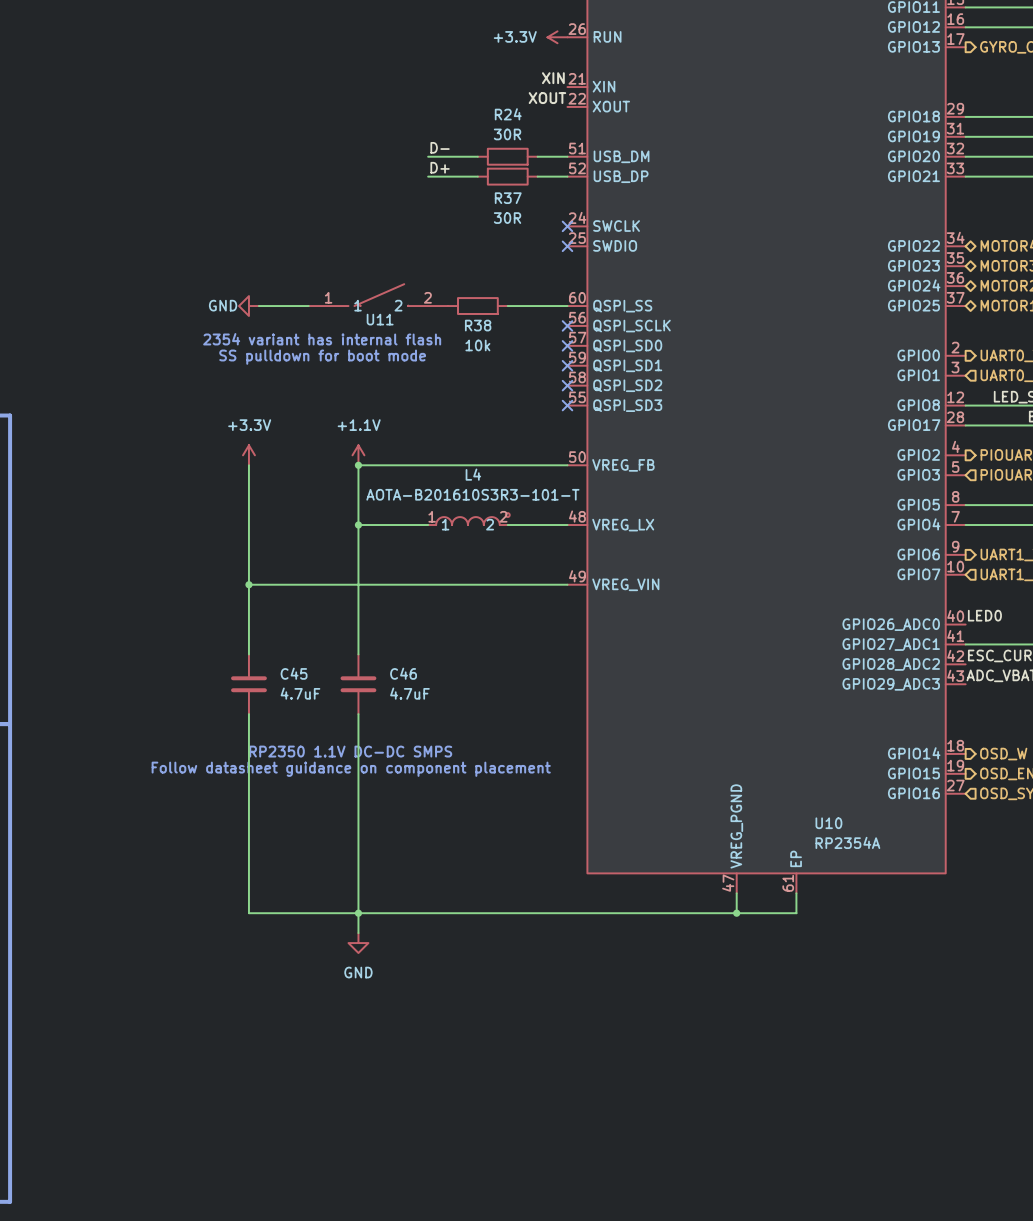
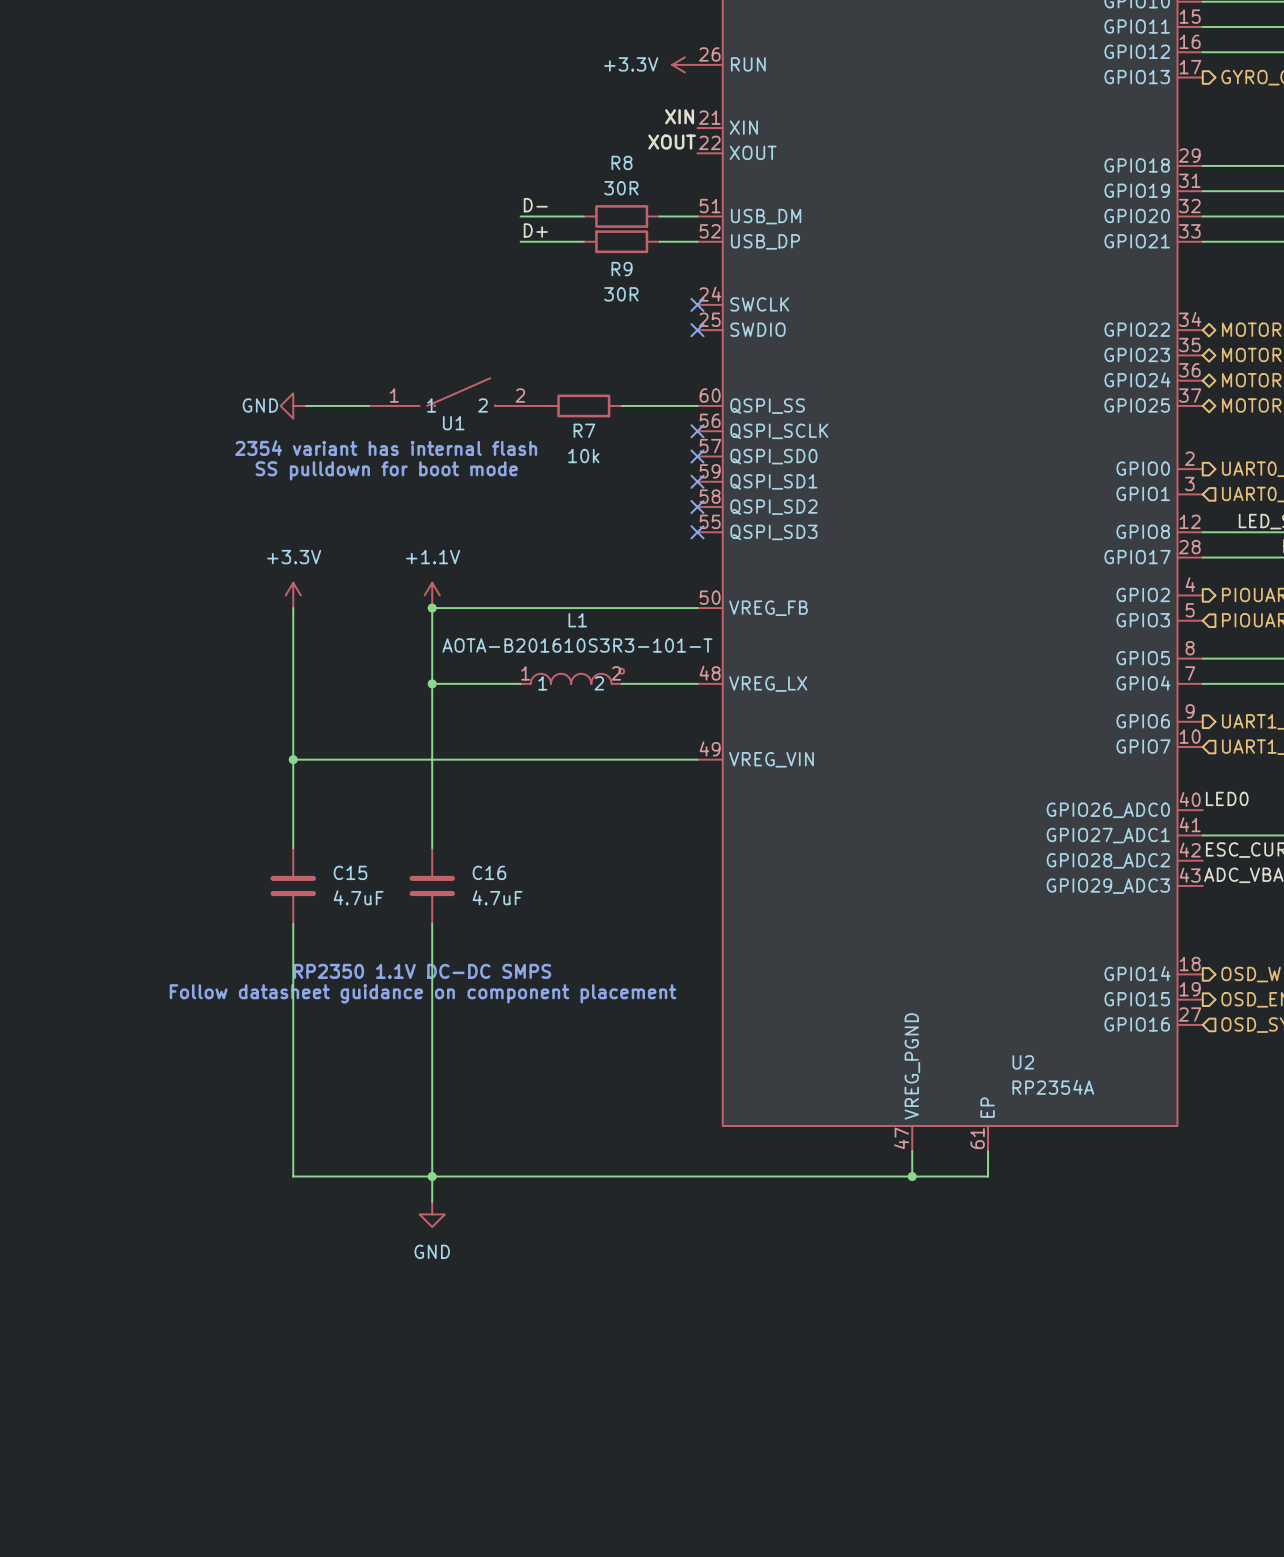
R24 name: R24 (508, 114) -> R8 (621, 162)
R37 name: R37 (508, 198) -> R9 (621, 269)
U11 name: U11 (380, 319) -> U1 (453, 423)
R38 name: R38 (478, 325) -> R7 (584, 430)
L4 name: L4 (473, 474) -> L1 (577, 620)
C45 name: C45 (294, 673) -> C15 (350, 872)
C46 name: C46 (403, 673) -> C16 (489, 872)
U10 name: U10 (828, 823) -> U2 (1023, 1062)

